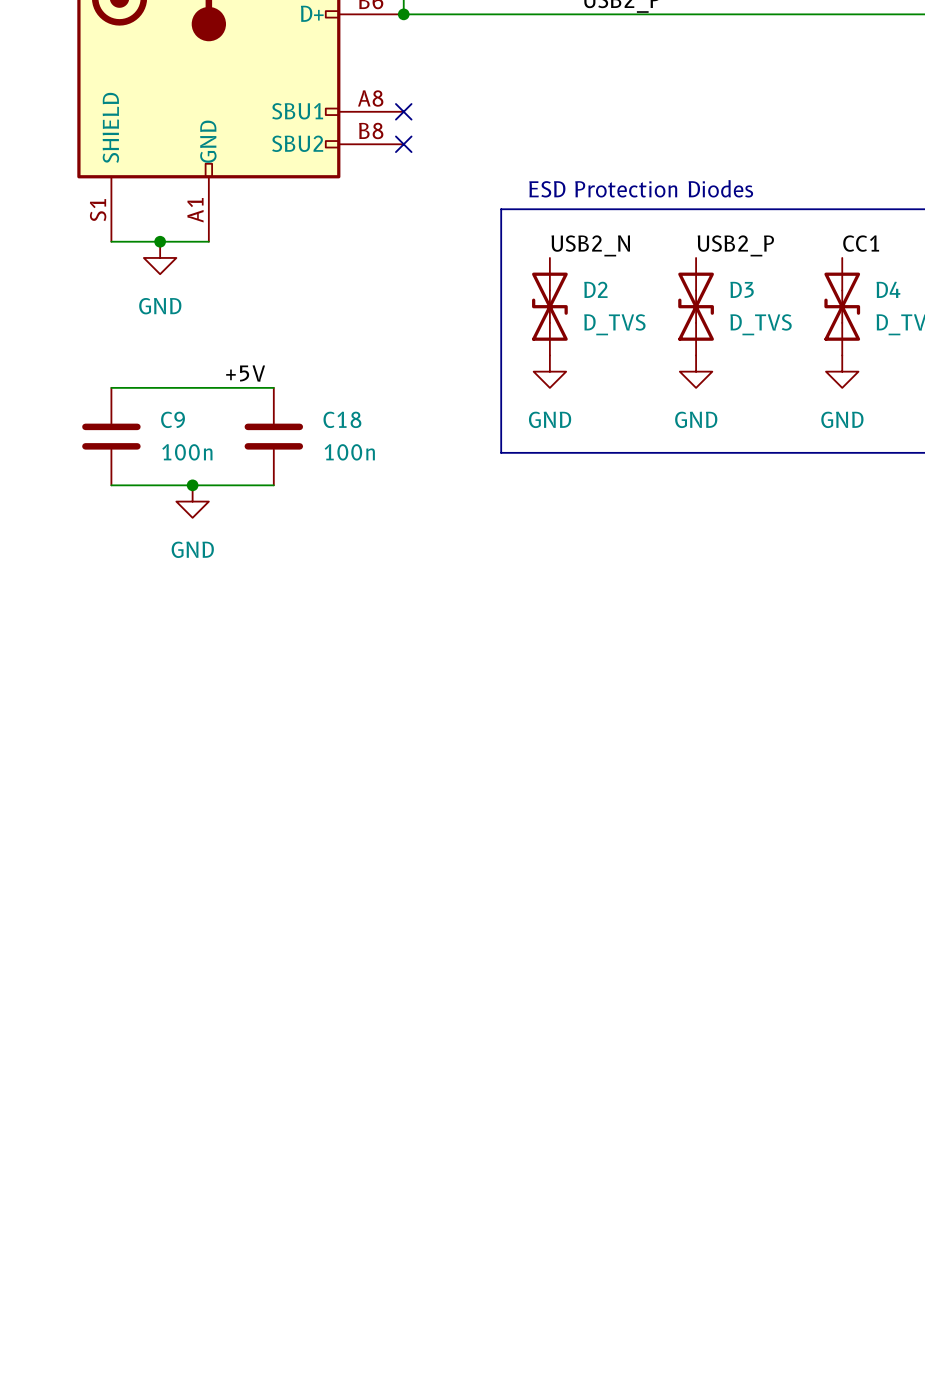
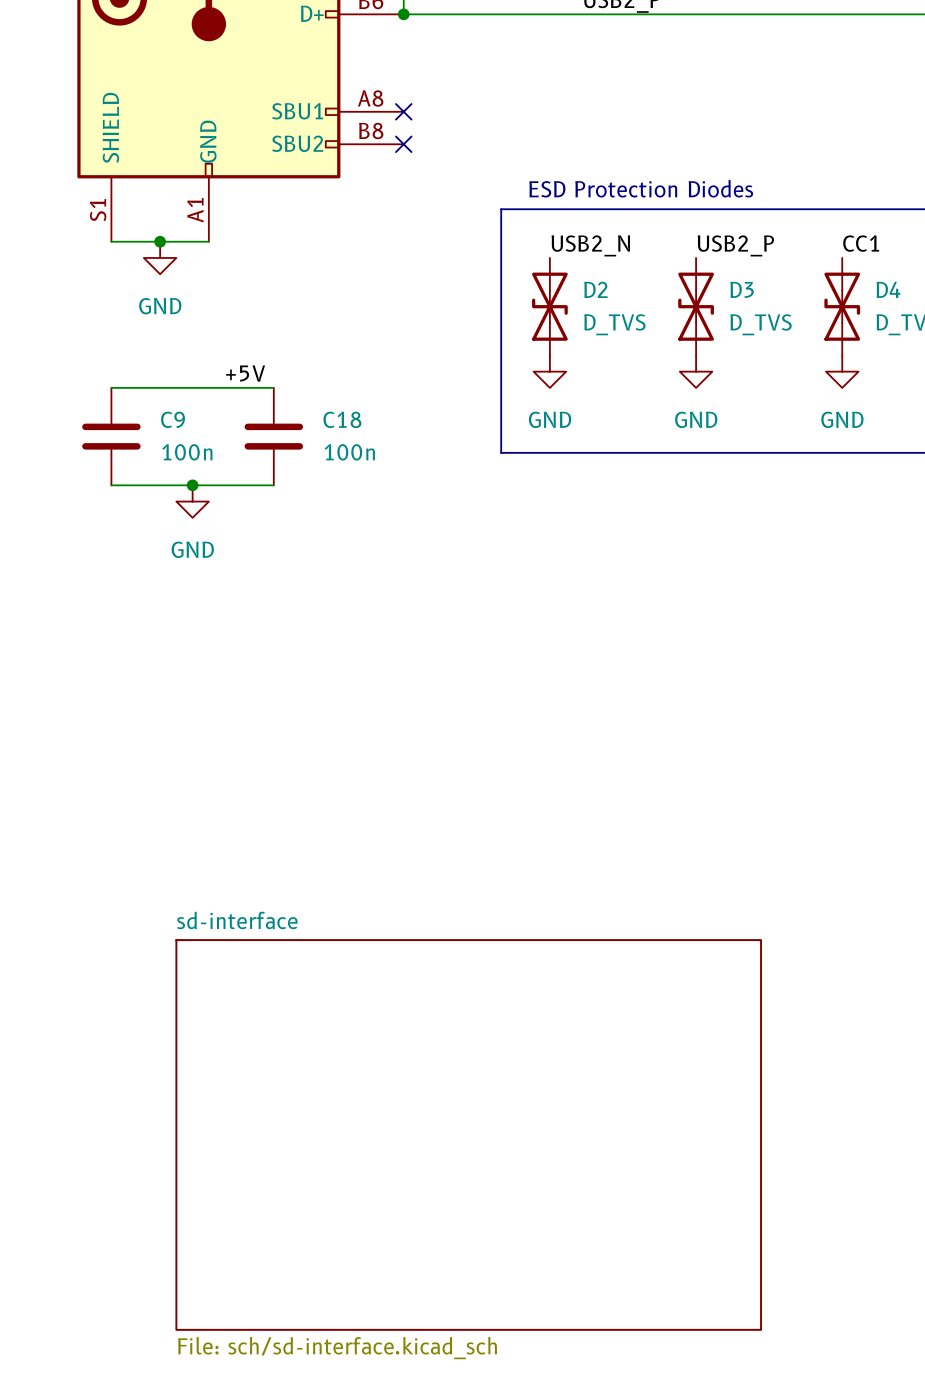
sheet sd-interface: none -> File: sch/sd-interface.kicad_sch (468, 1134)

